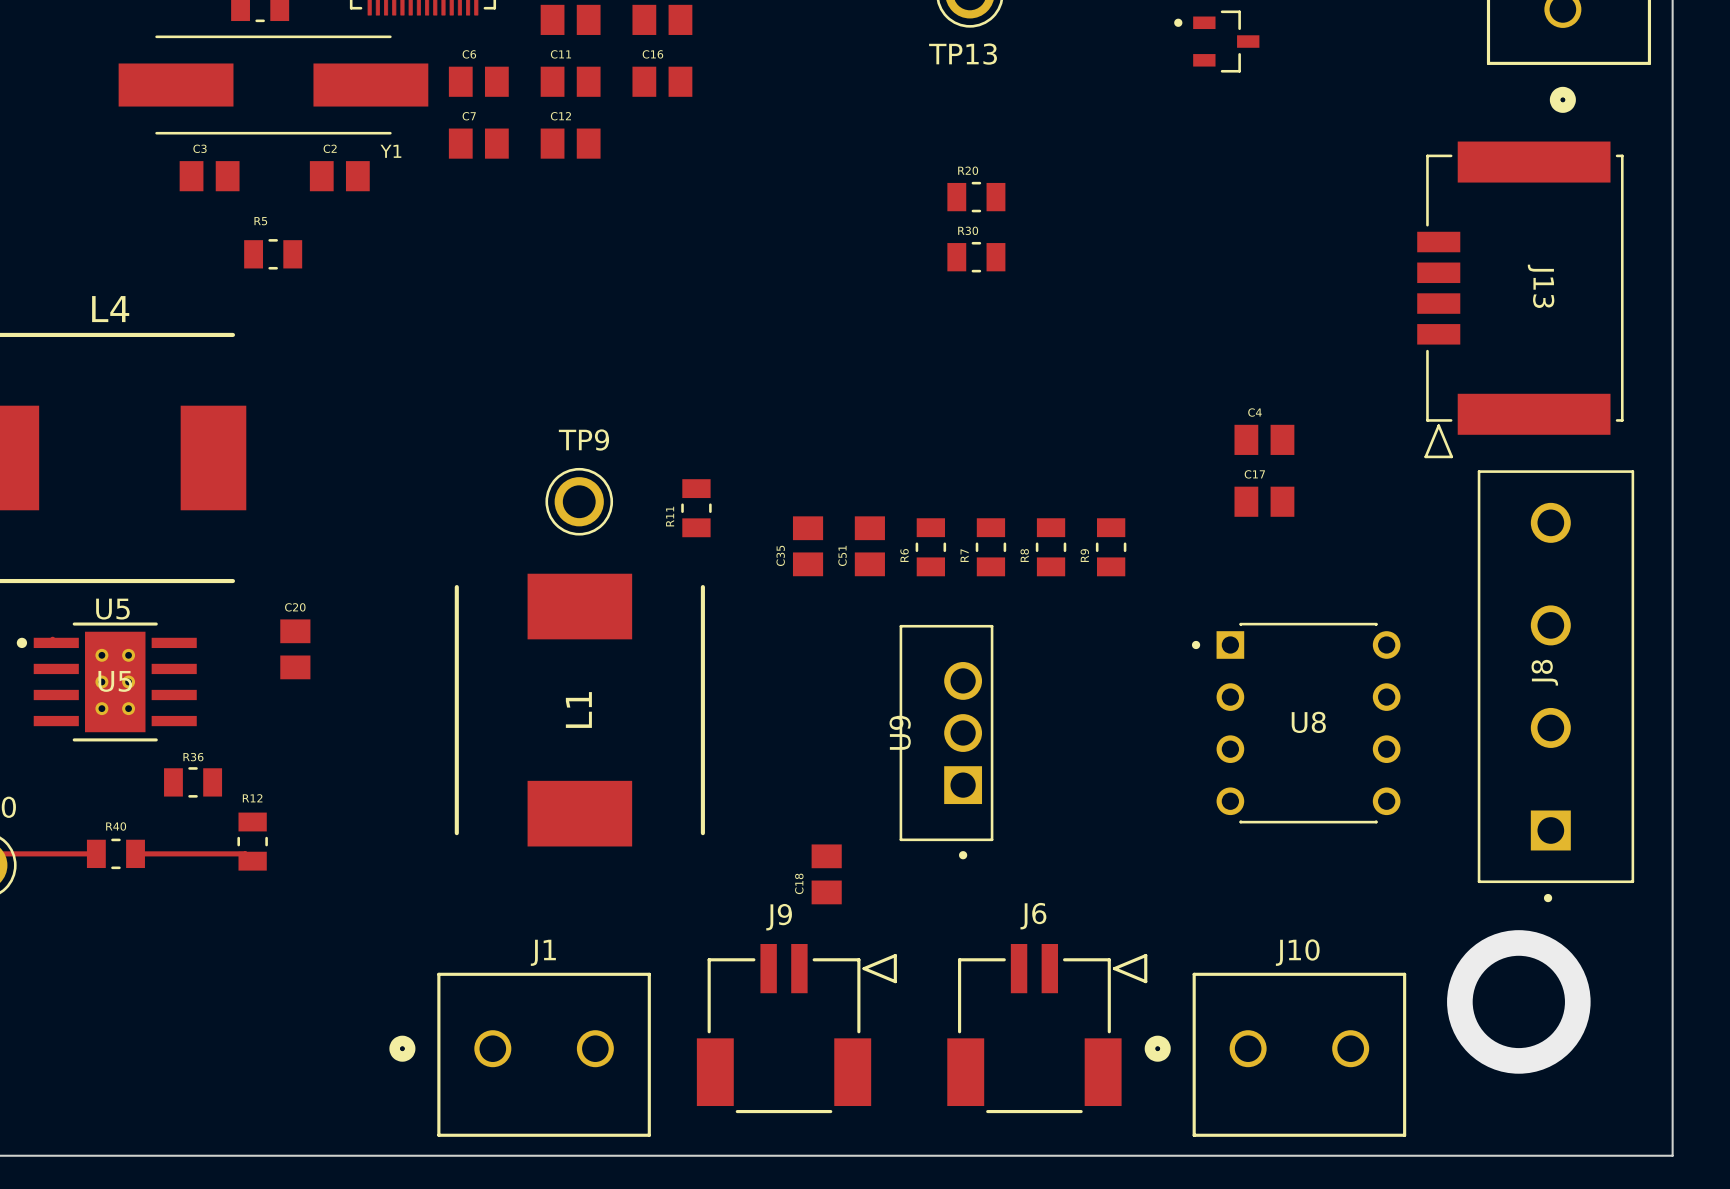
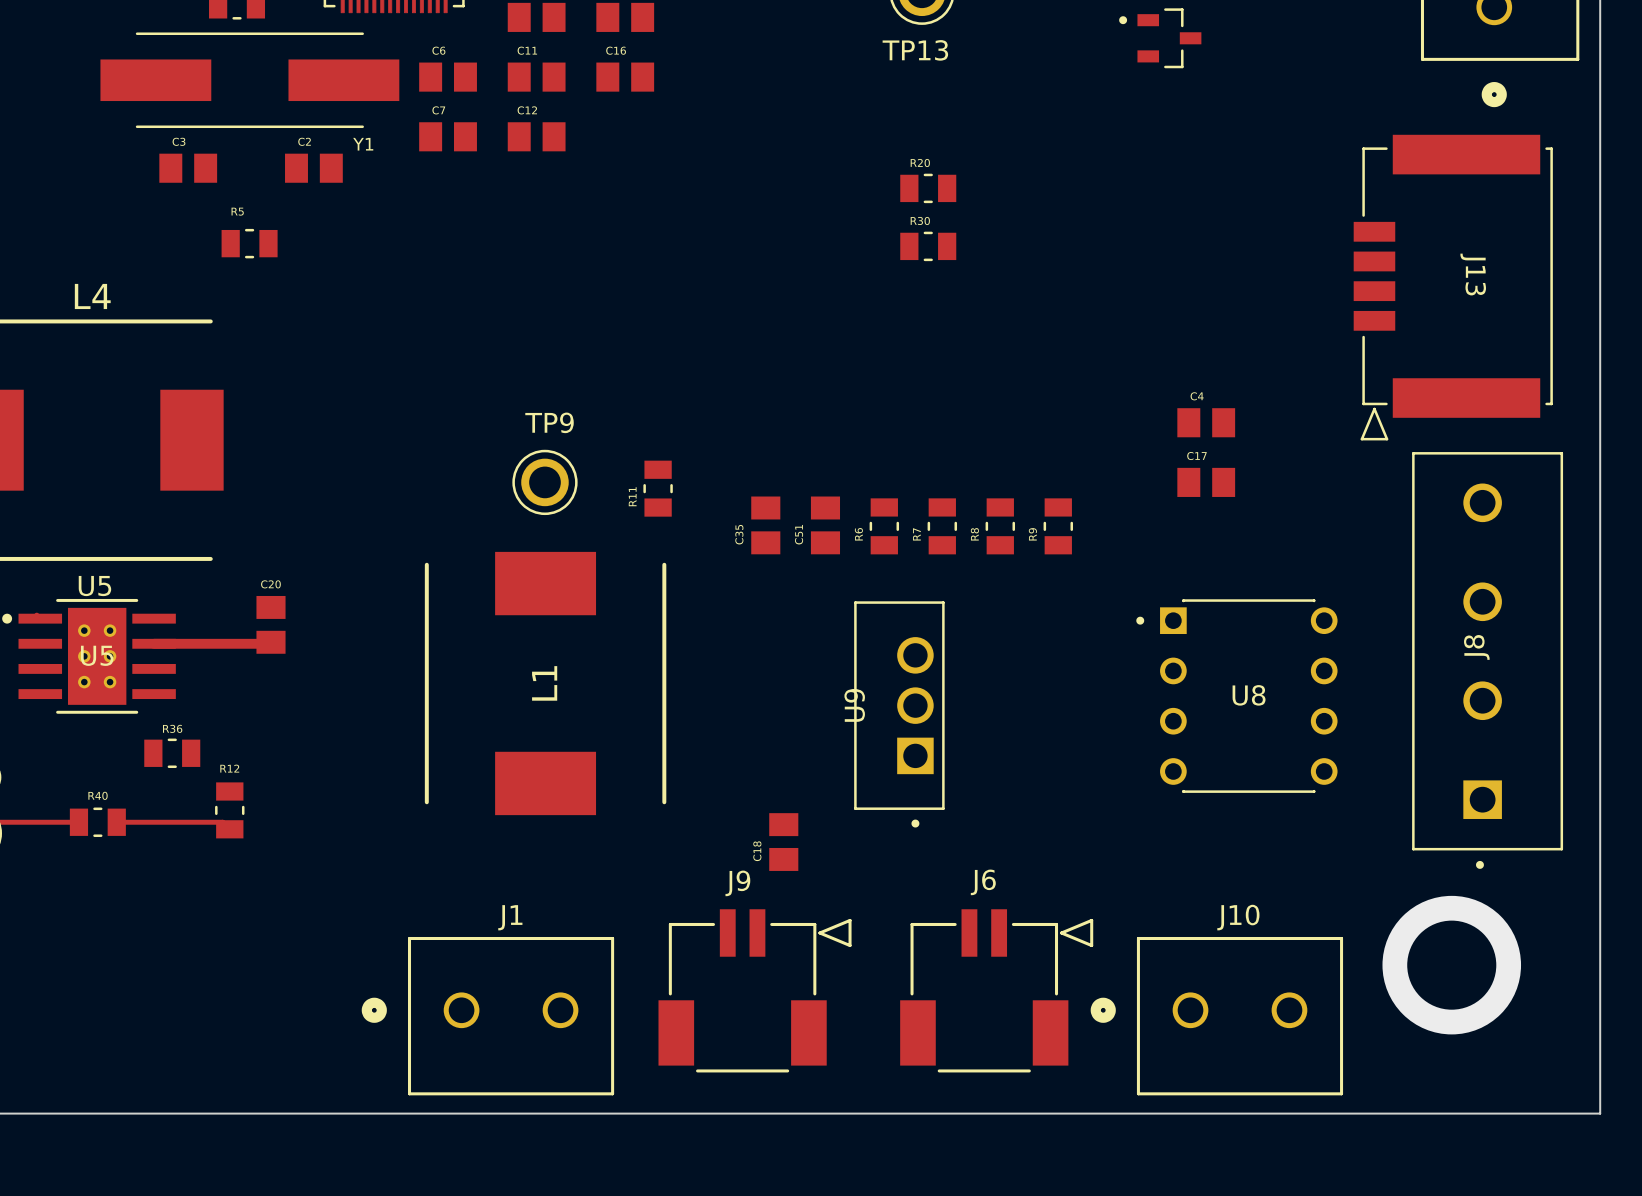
track: none -> (271, 642) (154, 643)

